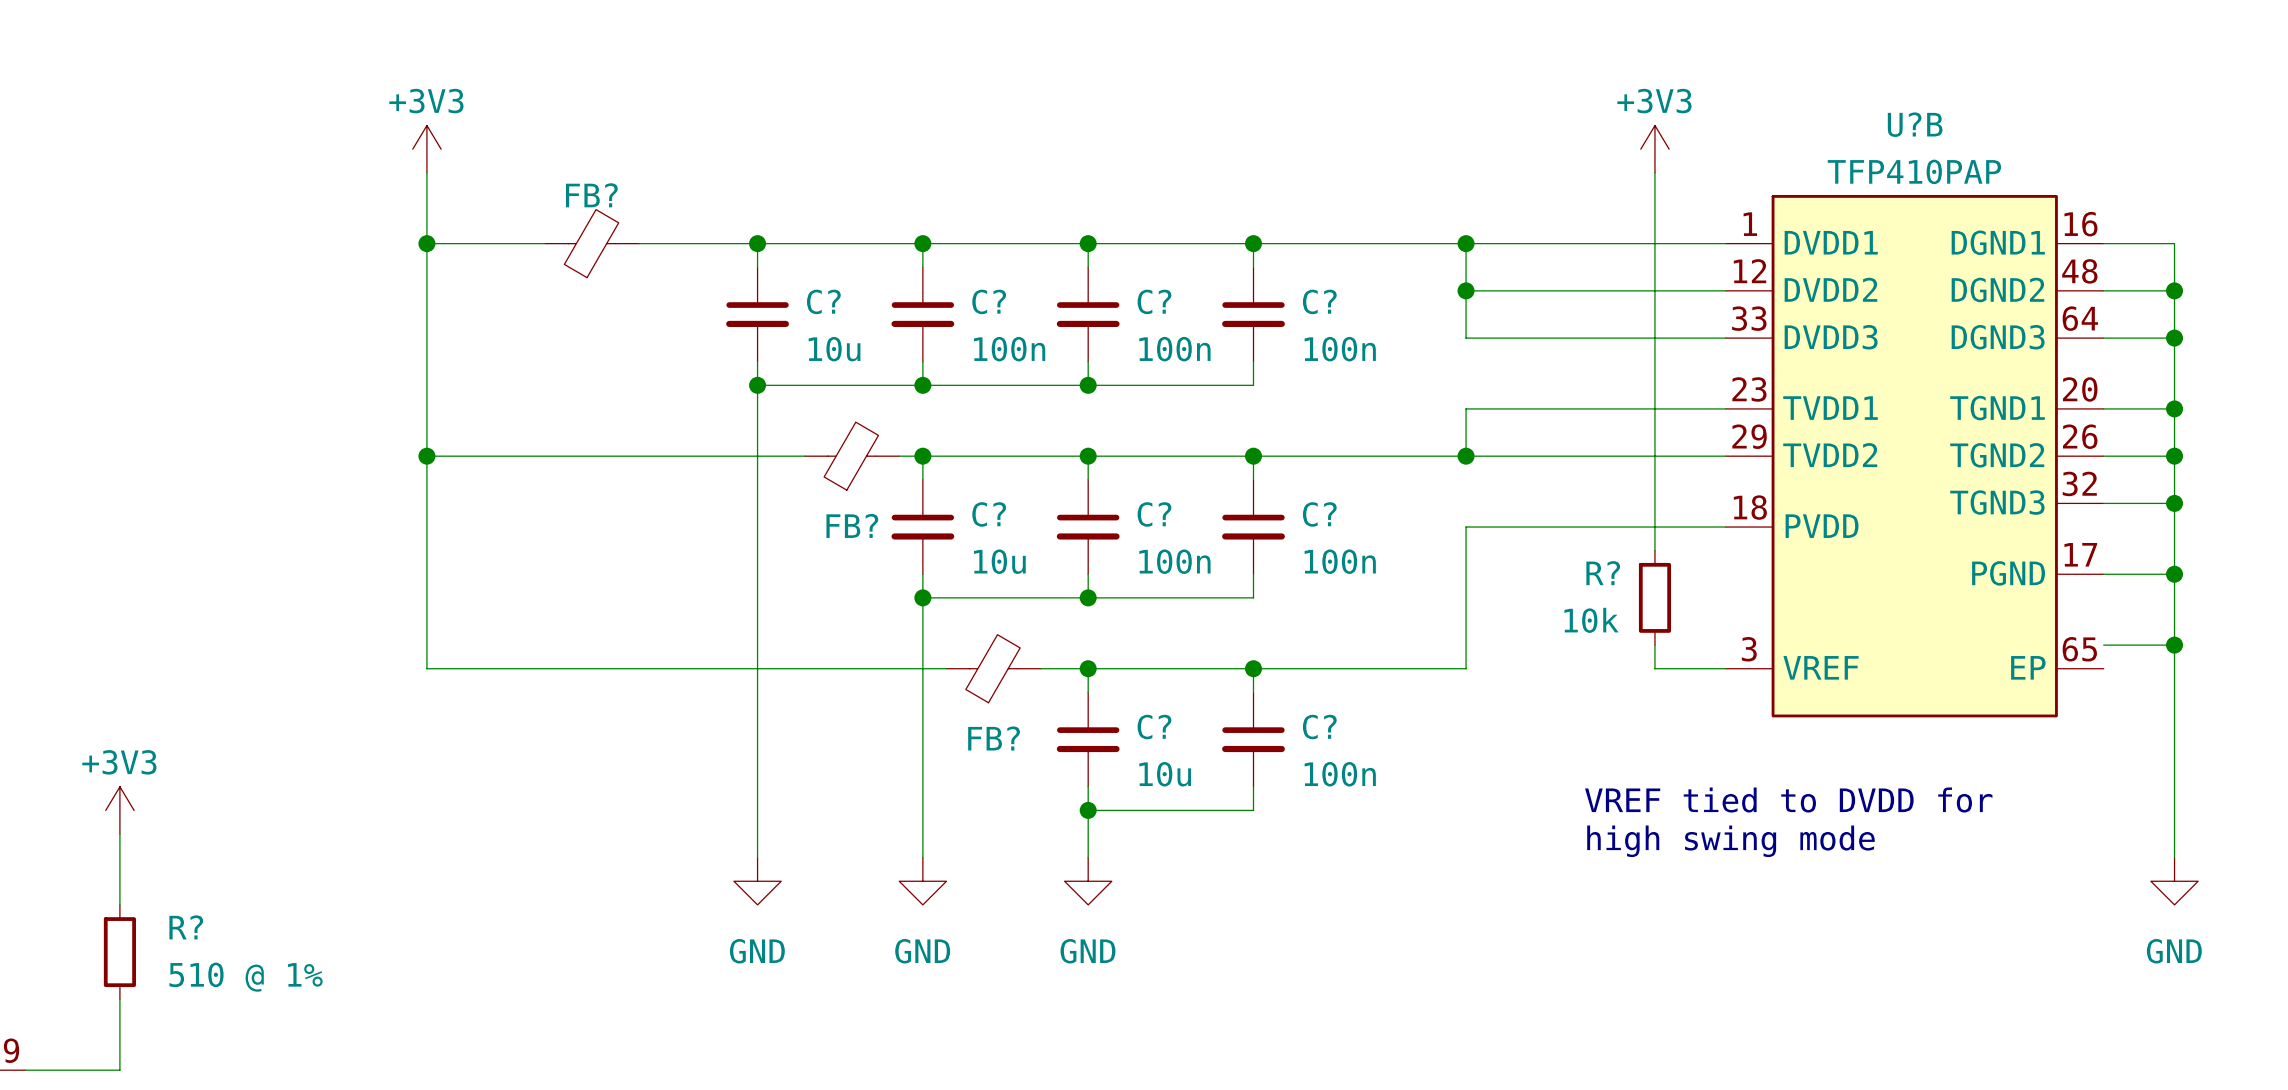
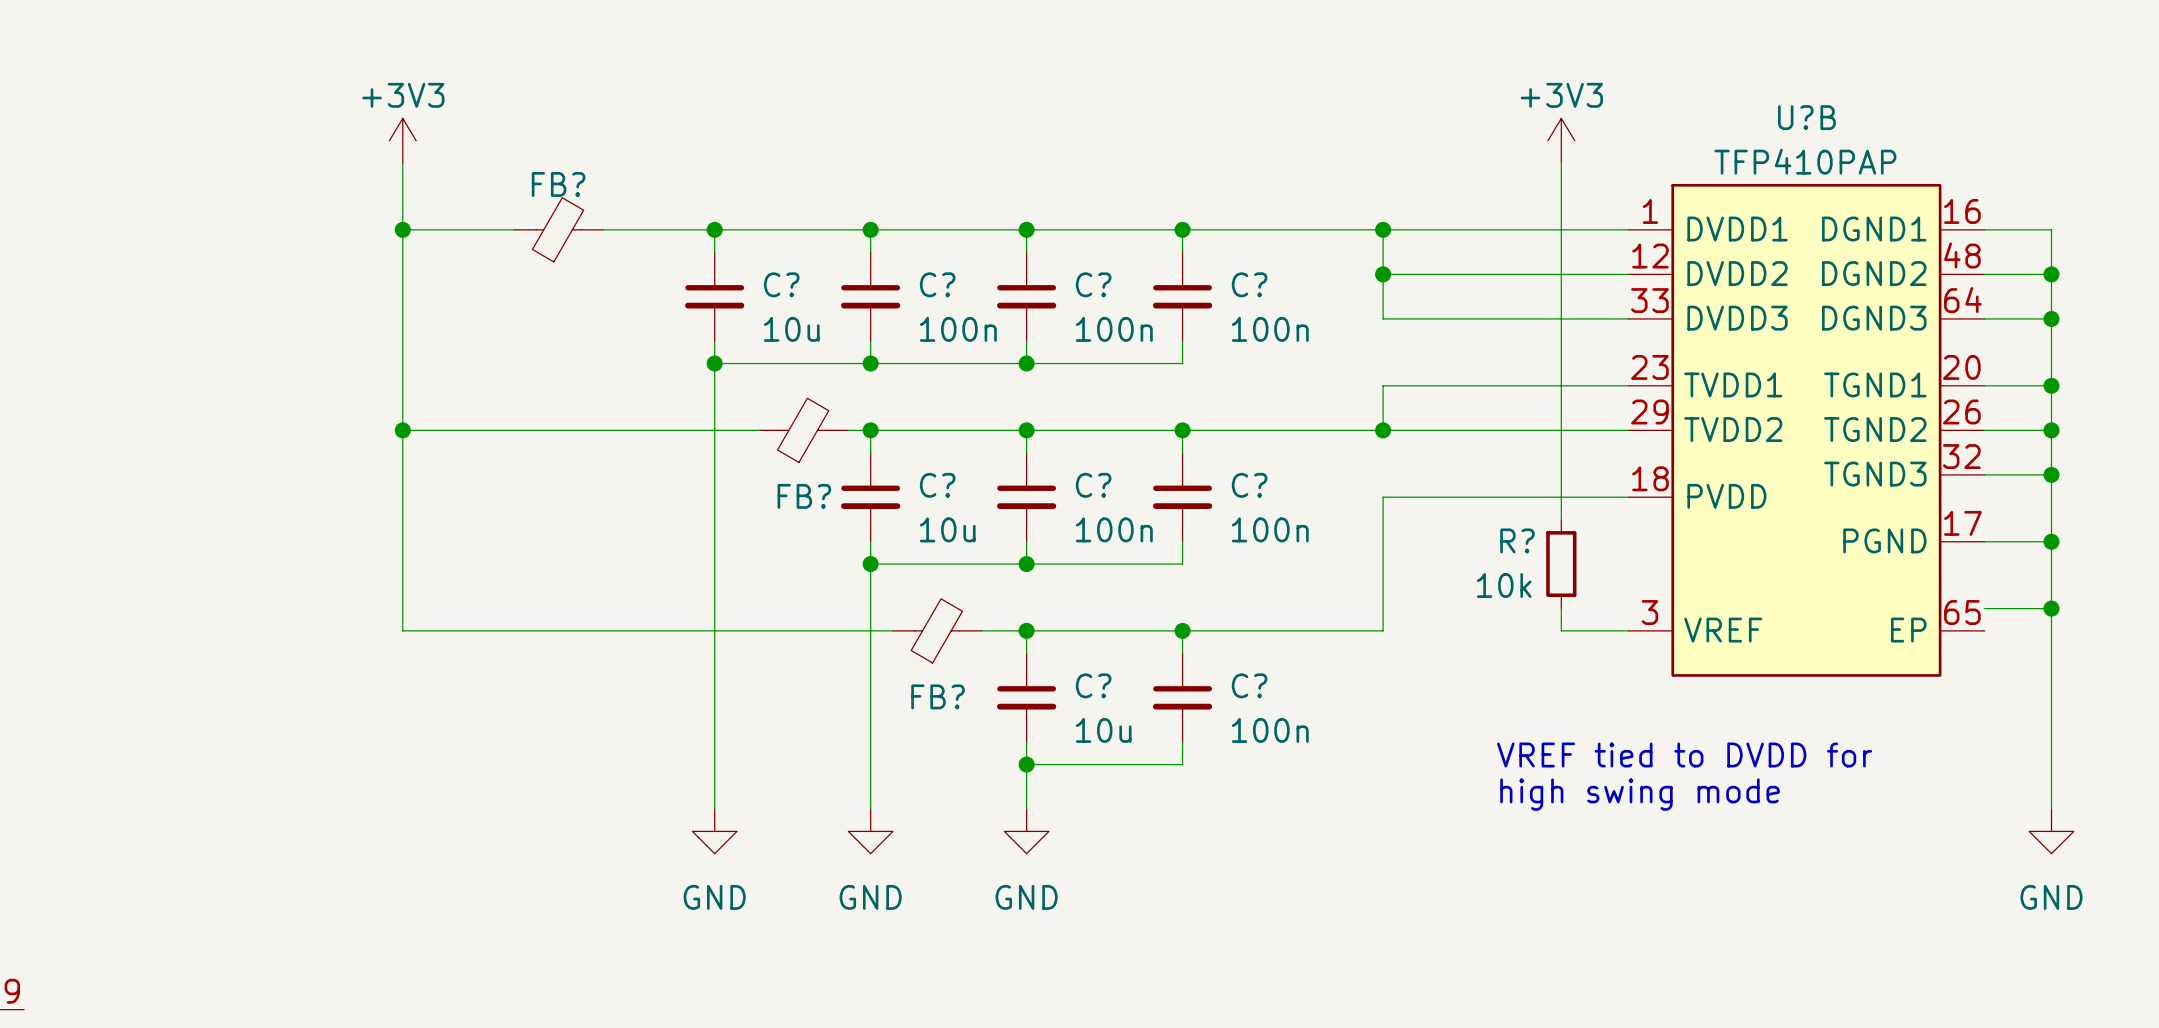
power symbol: +3V3 (119, 810) -> none
wire: (119, 834) (119, 904) -> none
R?: 510 @ 1% (119, 952) -> none
wire: (119, 999) (119, 1070) (25, 1070) -> none

